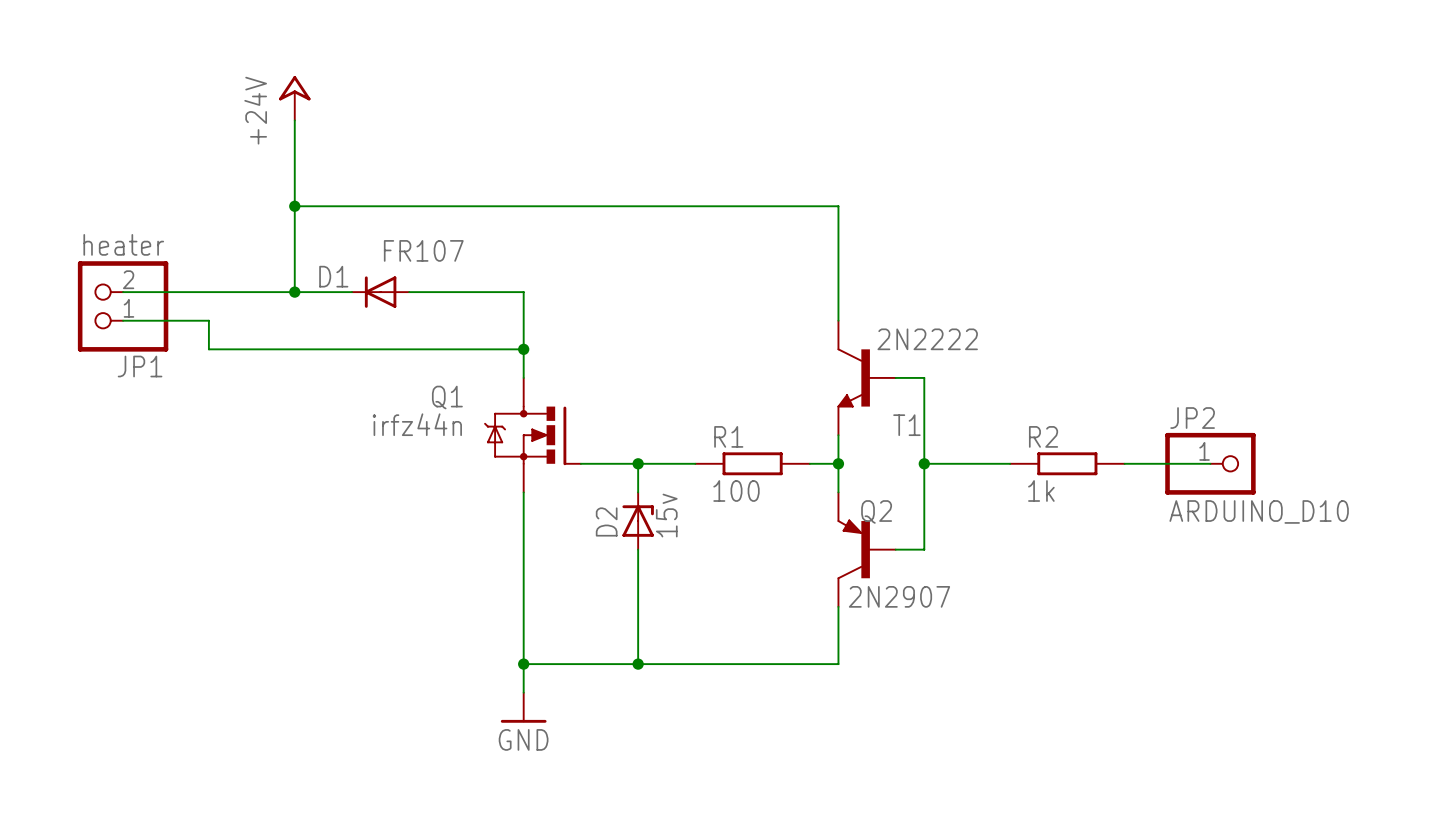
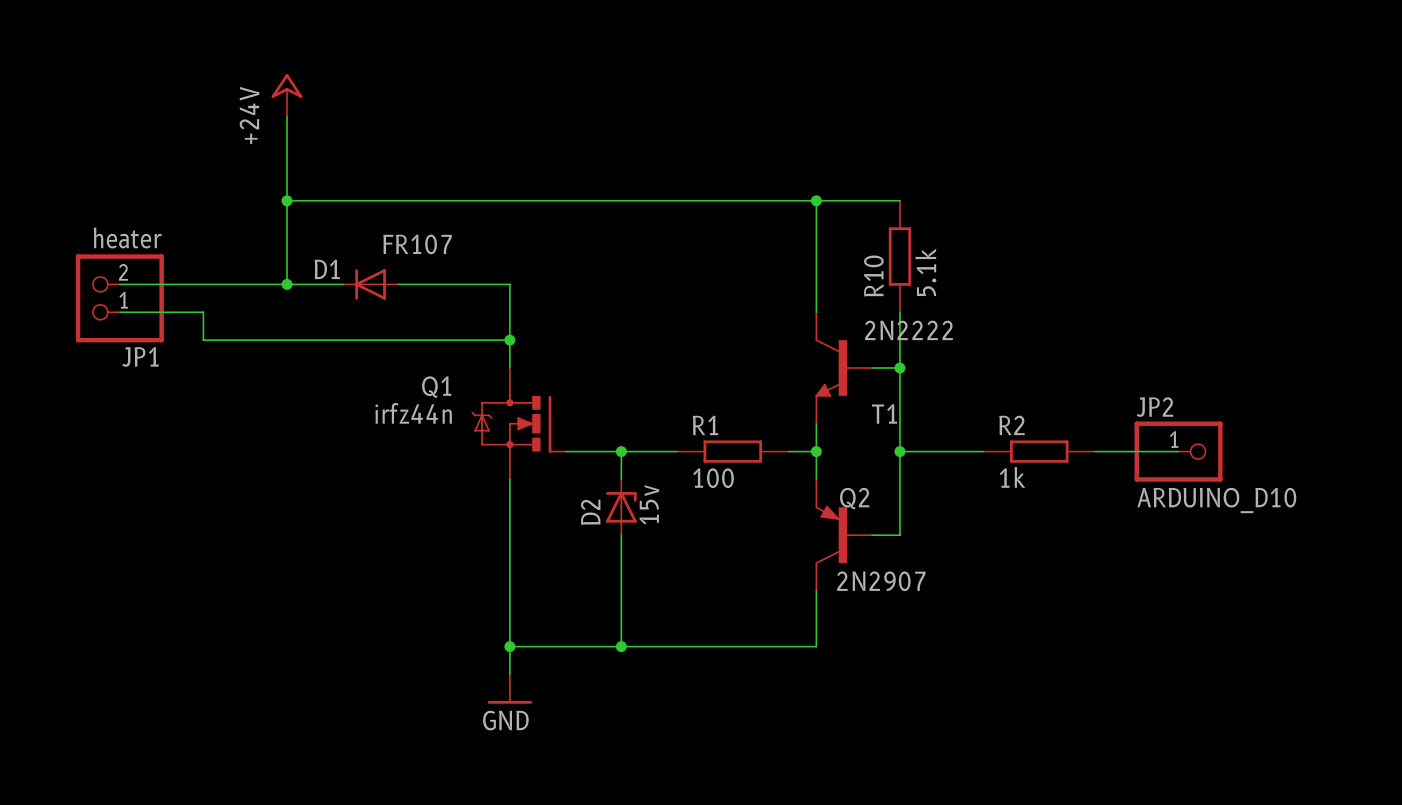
wire: none -> (816, 200) (899, 200)
junction: none -> (816, 200)
R10: none -> 5.1k (899, 256)
wire: none -> (899, 312) (899, 368)
junction: none -> (899, 368)

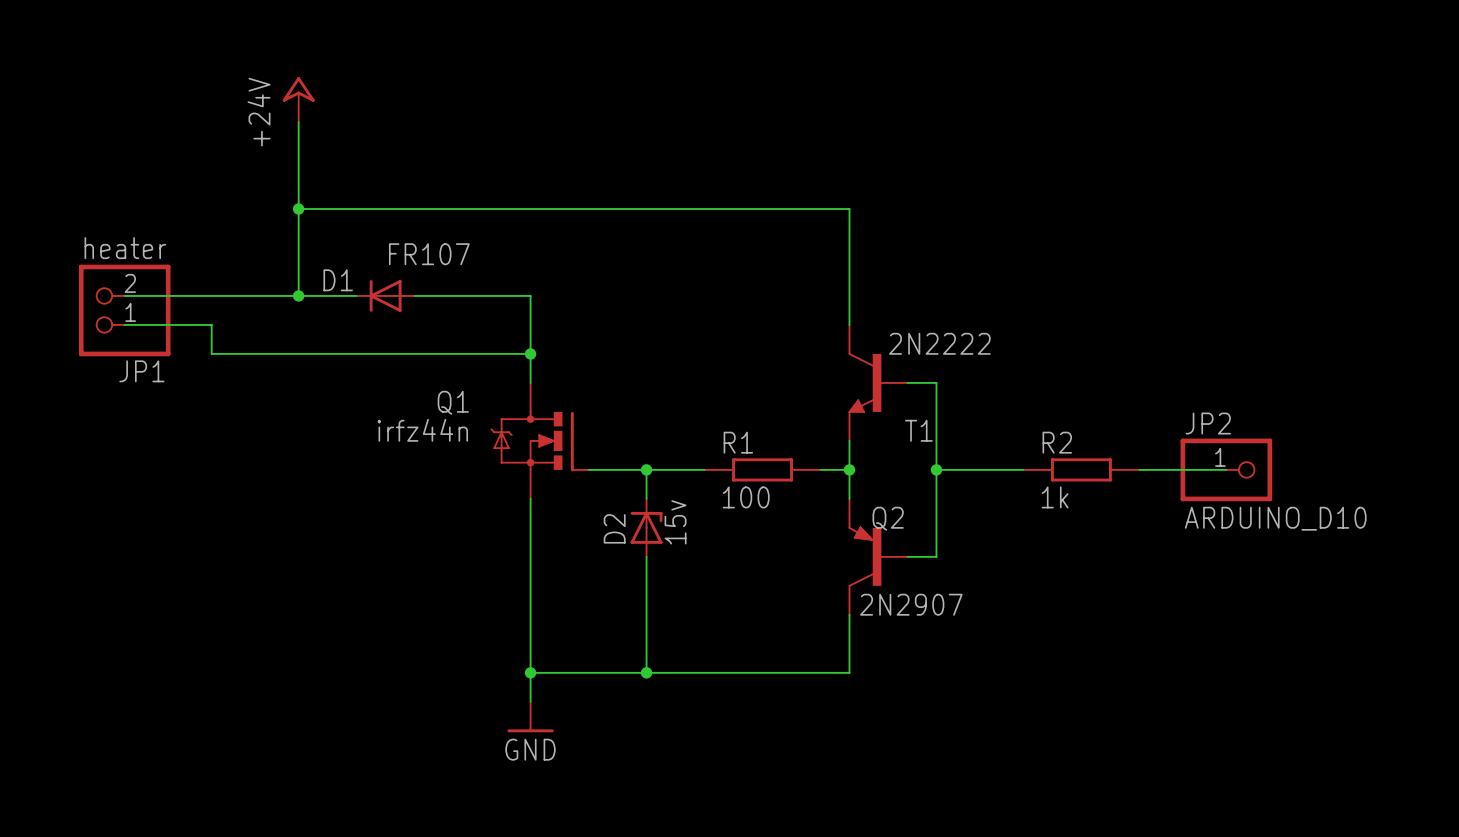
wire: (816, 200) (899, 200) -> none
junction: (816, 200) -> none
R10: 5.1k (899, 256) -> none
wire: (899, 312) (899, 368) -> none
junction: (899, 368) -> none

